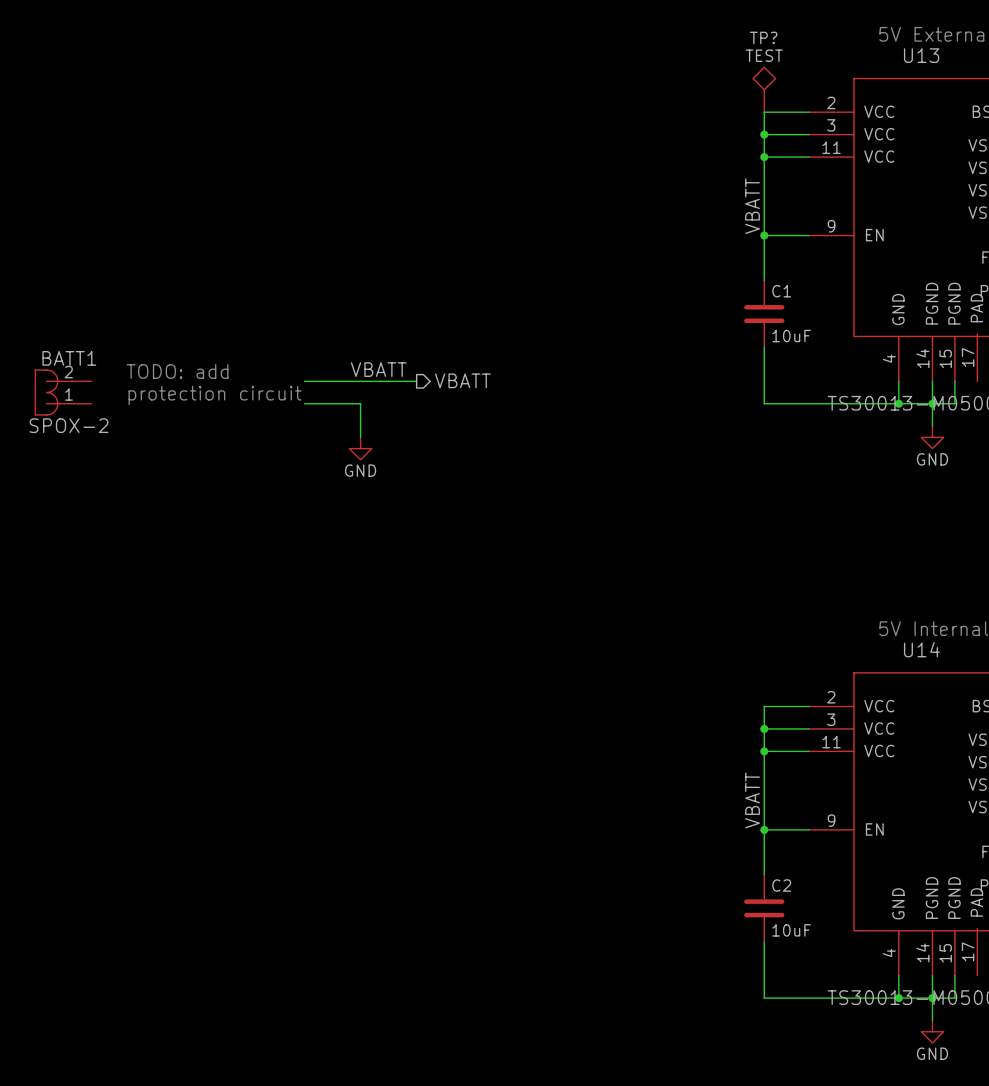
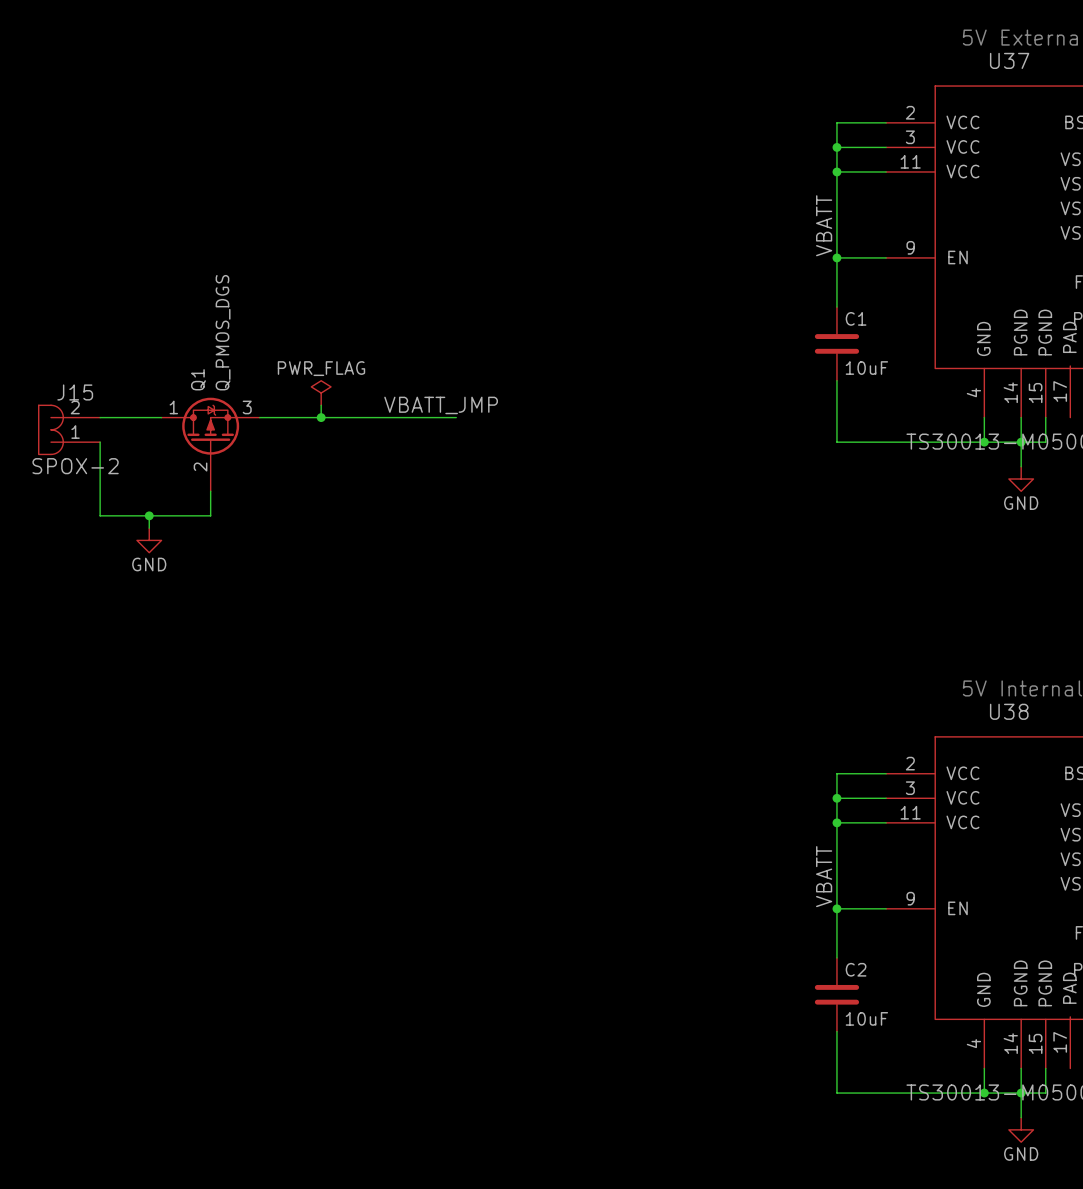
U13 name: U13 (921, 55) -> U37 (1009, 60)
TP?: TEST (764, 89) -> none
BATT1 name: BATT1 (69, 358) -> J15 (75, 392)
power symbol: none -> PWR_FLAG (321, 393)
label: VBATT (378, 369) -> VBATT_JMP (441, 405)
wire: none -> (321, 405) (321, 417)
text: TODO: add (177, 371) -> none
hierarchical label: VBATT (462, 380) -> none
wire: none -> (100, 417) (161, 417)
wire: none -> (259, 417) (333, 417)
junction: none -> (321, 417)
text: protection circuit (215, 395) -> none
wire: none -> (100, 442) (100, 515) (210, 515) (210, 491)
wire: (304, 403) (360, 403) (360, 437) -> none
Q1: none -> Q_PMOS_DGS (210, 444)
power symbol: GND (360, 448) -> none
wire: none -> (149, 515) (149, 528)
junction: none -> (149, 515)
power symbol: none -> GND (149, 540)
U14 name: U14 (921, 649) -> U38 (1009, 711)

